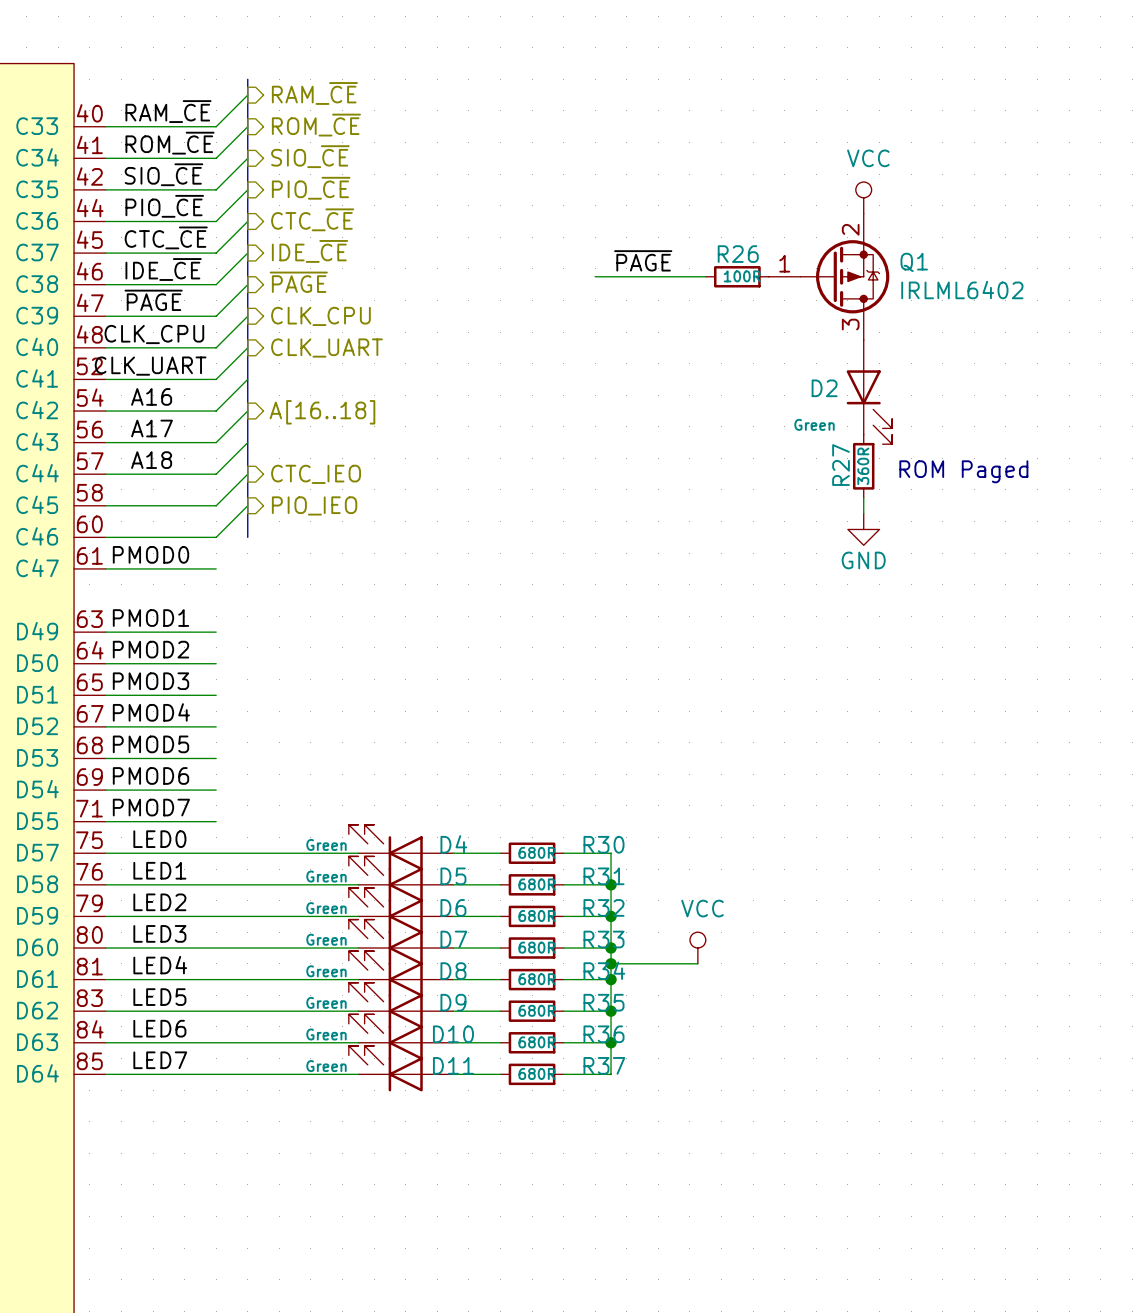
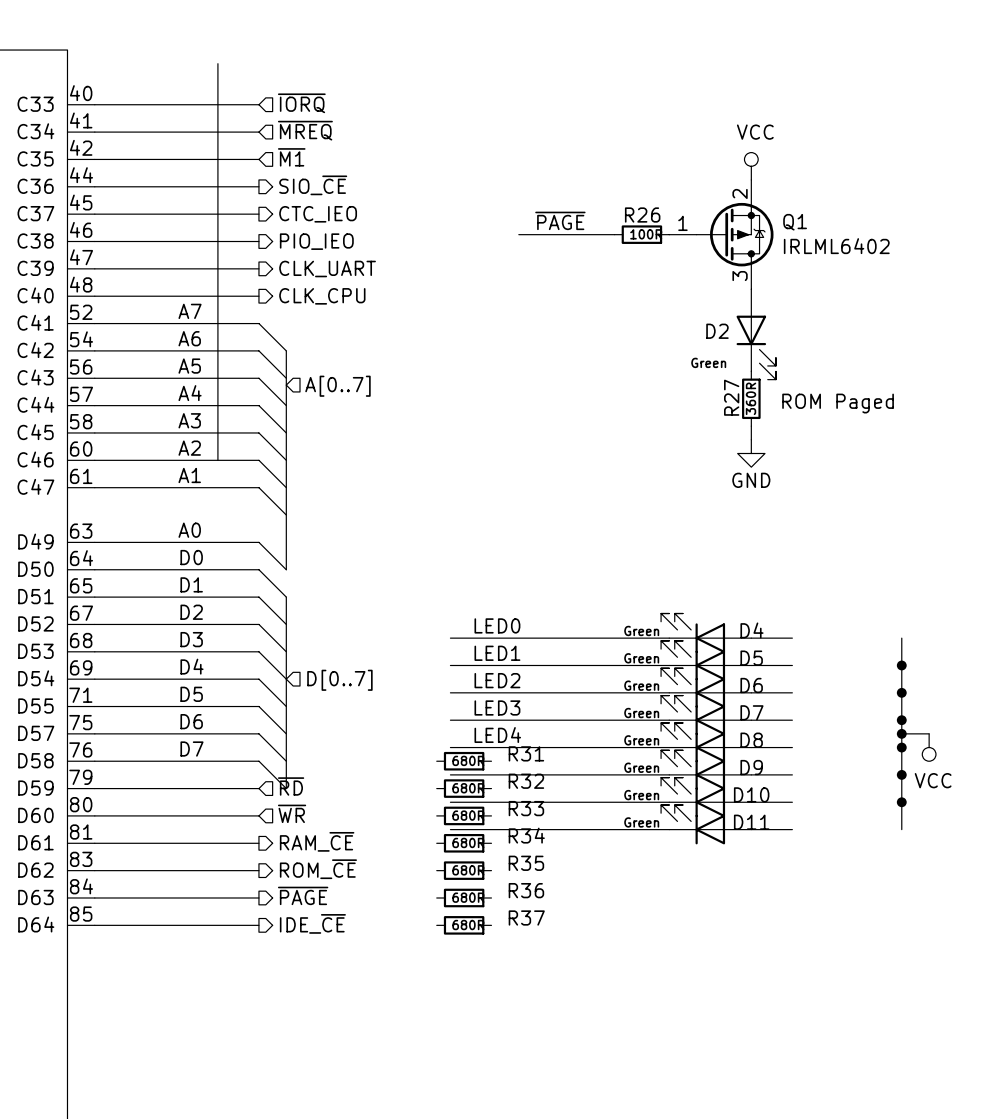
hierarchical label: RAM_~{CE} (314, 93) -> none
wire: (247, 95) (216, 126) -> (258, 104) (190, 104)
label: RAM_~{CE} (168, 111) -> none
hierarchical label: ROM_~{CE} (316, 125) -> none
hierarchical label: none -> ~{IORQ} (301, 103)
wire: (247, 126) (216, 158) -> (258, 132) (190, 132)
label: ROM_~{CE} (170, 143) -> none
hierarchical label position: SIO_~{CE} (310, 156) -> SIO_~{CE} (313, 185)
hierarchical label: none -> ~{MREQ} (305, 130)
wire: (247, 158) (216, 189) -> (258, 159) (190, 159)
label: SIO_~{CE} (163, 174) -> none
hierarchical label: none -> ~{M1} (291, 157)
hierarchical label: PIO_~{CE} (311, 188) -> none
wire: (247, 189) (216, 221) -> (258, 186) (190, 186)
label: PIO_~{CE} (164, 206) -> none
hierarchical label: CTC_~{CE} (312, 219) -> none
wire: (247, 221) (216, 253) -> (258, 214) (190, 214)
label: CTC_~{CE} (166, 237) -> none
hierarchical label: IDE_~{CE} (310, 251) -> none
wire: (247, 253) (216, 284) -> (258, 241) (190, 241)
label: IDE_~{CE} (163, 269) -> none
hierarchical label: ~{PAGE} (298, 282) -> none
wire: (247, 284) (216, 316) -> (258, 268) (190, 268)
label: ~{PAGE} (153, 300) -> none
wire: (247, 316) (216, 347) -> (258, 296) (190, 296)
hierarchical label position: CLK_CPU (320, 316) -> CLK_CPU (322, 296)
label: CLK_CPU (154, 334) -> none
wire: (247, 347) (216, 379) -> (286, 350) (258, 323) (190, 323)
hierarchical label position: CLK_UART (326, 348) -> CLK_UART (327, 268)
label: CLK_UART (150, 366) -> A7 (190, 311)
wire: (247, 379) (216, 411) -> (286, 378) (258, 350) (190, 350)
label: A16 (151, 396) -> none
label: none -> A6 (189, 338)
wire: (247, 411) (216, 442) -> (286, 405) (258, 378) (190, 378)
bus: none -> (286, 350) (286, 569)
hierarchical label: A[16..18] (322, 412) -> none
label: A17 (151, 428) -> none
label: none -> A5 (189, 366)
wire: (247, 442) (216, 474) -> (286, 432) (258, 405) (190, 405)
hierarchical label: none -> A[0..7] (337, 386)
label: none -> A4 (190, 393)
label: A18 (151, 460) -> none
wire: (247, 474) (216, 505) -> (286, 460) (258, 432) (190, 432)
hierarchical label position: CTC_IEO (316, 474) -> CTC_IEO (318, 214)
label: none -> A3 (189, 420)
wire: (247, 505) (216, 537) -> (286, 487) (258, 460) (190, 460)
hierarchical label position: PIO_IEO (314, 505) -> PIO_IEO (316, 241)
label: none -> A2 (189, 448)
label: PMOD0 (151, 554) -> A1 (189, 475)
wire: none -> (190, 487) (258, 487) (286, 515)
label: PMOD1 (151, 618) -> A0 (189, 530)
wire: none -> (190, 542) (258, 542) (286, 569)
label: PMOD2 (151, 649) -> D0 (191, 557)
wire: none -> (190, 569) (258, 569) (286, 597)
label: PMOD3 (151, 681) -> D1 (191, 584)
wire: none -> (190, 597) (258, 597) (286, 624)
bus: none -> (286, 597) (286, 788)
label: PMOD4 (151, 712) -> D2 (191, 612)
wire: none -> (190, 624) (258, 624) (286, 651)
label: none -> LED0 (497, 625)
wire: none -> (450, 638) (669, 638)
wire: none -> (751, 638) (792, 638)
wire: none -> (901, 638) (901, 829)
label: PMOD5 (151, 744) -> D3 (191, 639)
wire: none -> (190, 651) (258, 651) (286, 679)
label: none -> LED1 (497, 653)
wire: none -> (450, 665) (669, 665)
wire: none -> (751, 665) (792, 665)
junction: none -> (901, 665)
label: PMOD6 (151, 775) -> D4 (191, 666)
wire: none -> (190, 679) (258, 679) (286, 706)
hierarchical label: none -> D[0..7] (339, 680)
label: none -> LED2 (497, 680)
wire: none -> (450, 692) (669, 692)
junction: none -> (901, 692)
label: PMOD7 (151, 807) -> D5 (191, 694)
wire: none -> (190, 706) (258, 706) (286, 733)
label: none -> LED3 (497, 707)
wire: none -> (450, 720) (669, 720)
junction: none -> (901, 720)
label: LED0 (159, 839) -> none
label: none -> D6 (191, 721)
D4 position: (400, 847) -> (706, 633)
wire: (295, 853) (358, 853) -> (258, 733) (286, 761)
wire: (453, 853) (500, 853) -> none
R30: 680R (532, 853) -> none
wire: (563, 853) (611, 853) (611, 1074) (563, 1074) -> none
wire: none -> (901, 733) (929, 733)
junction: none -> (901, 733)
label: none -> LED4 (497, 735)
wire: none -> (450, 747) (669, 747)
junction: none -> (901, 747)
power symbol: none -> VCC (929, 747)
label: LED1 (159, 870) -> none
label: none -> D7 (191, 749)
D5 position: (400, 879) -> (706, 660)
wire: (295, 884) (358, 884) -> (258, 761) (286, 788)
wire: (453, 884) (500, 884) -> none
wire: (563, 884) (611, 884) -> (751, 692) (792, 692)
junction: (611, 884) -> none
wire: none -> (450, 774) (669, 774)
junction: none -> (901, 774)
label: LED2 (159, 902) -> none
D6 position: (400, 910) -> (706, 687)
hierarchical label: none -> ~{RD} (291, 786)
wire: (295, 916) (358, 916) -> none
wire: (453, 916) (500, 916) -> none
wire: (563, 916) (611, 916) -> (751, 720) (792, 720)
junction: (611, 916) -> none
wire: none -> (450, 802) (669, 802)
junction: none -> (901, 802)
label: LED3 (159, 933) -> none
D7 position: (400, 942) -> (706, 715)
hierarchical label: none -> ~{WR} (292, 813)
wire: (295, 948) (358, 948) -> none
wire: (453, 948) (500, 948) -> none
wire: (563, 948) (611, 948) -> (751, 747) (792, 747)
junction: (611, 948) -> none
power symbol: VCC (697, 948) -> none
wire: none -> (450, 829) (532, 829)
junction: (611, 963) -> none
wire: none -> (607, 829) (669, 829)
label: LED4 (160, 965) -> none
D8 position: (400, 973) -> (706, 742)
hierarchical label: none -> RAM_~{CE} (317, 841)
wire: (295, 979) (358, 979) -> none
wire: (453, 979) (500, 979) -> none
wire: (563, 979) (611, 979) -> (751, 774) (792, 774)
junction: (611, 979) -> none
label: LED5 (159, 997) -> none
D9 position: (400, 1005) -> (706, 769)
hierarchical label: none -> ROM_~{CE} (318, 869)
wire: (295, 1011) (358, 1011) -> none
wire: (453, 1011) (500, 1011) -> none
wire: (563, 1011) (611, 1011) -> (751, 802) (792, 802)
junction: (611, 1011) -> none
label: LED6 (159, 1028) -> none
D10 position: (400, 1037) -> (706, 797)
hierarchical label: none -> ~{PAGE} (303, 895)
wire: (295, 1042) (358, 1042) -> none
wire: (453, 1042) (500, 1042) -> none
wire: (563, 1042) (611, 1042) -> (751, 829) (792, 829)
junction: (611, 1042) -> none
label: LED7 (160, 1060) -> none
D11 position: (400, 1068) -> (706, 824)
hierarchical label: none -> IDE_~{CE} (312, 923)
wire: (295, 1074) (358, 1074) -> none
wire: (453, 1074) (500, 1074) -> none

